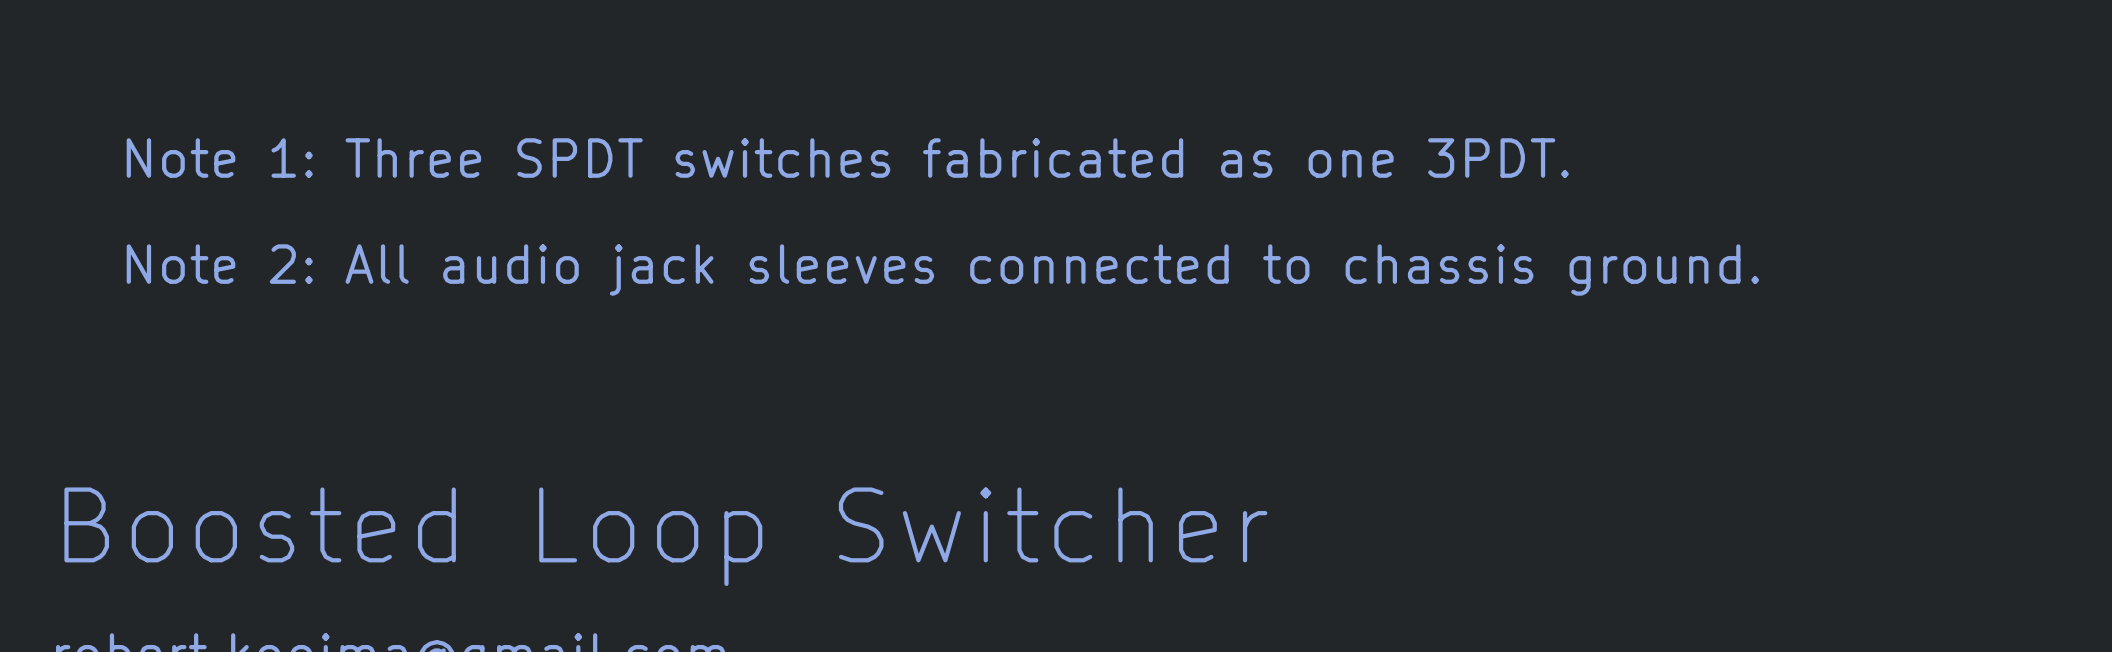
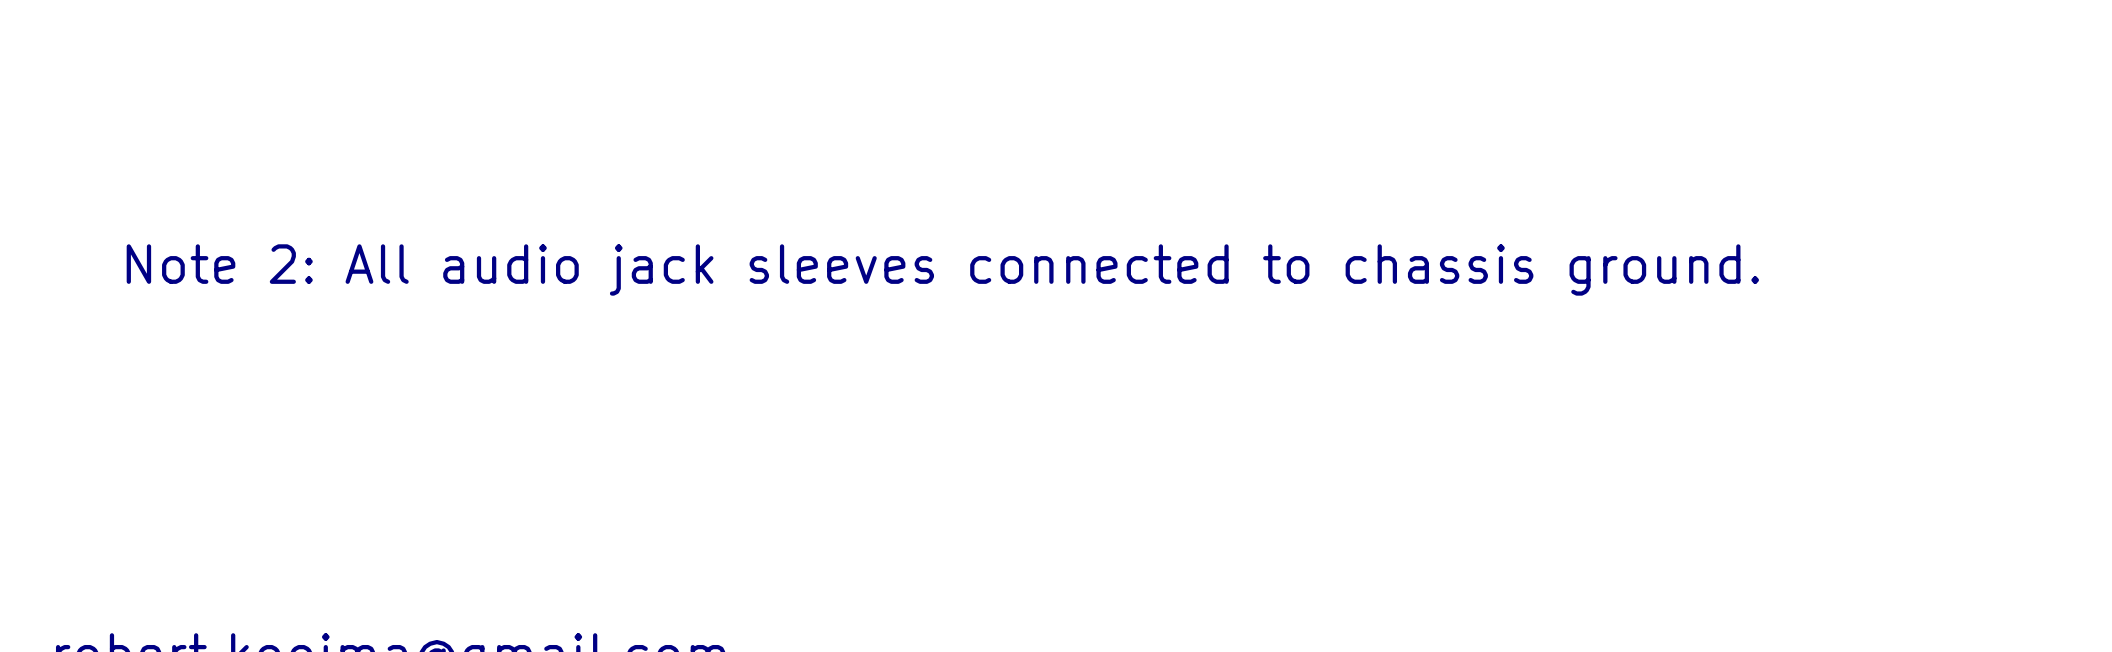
text: Note 1: Three SPDT switches fabricated as one 3PDT. (847, 158) -> none
text: Boosted Loop Switcher (665, 536) -> none

